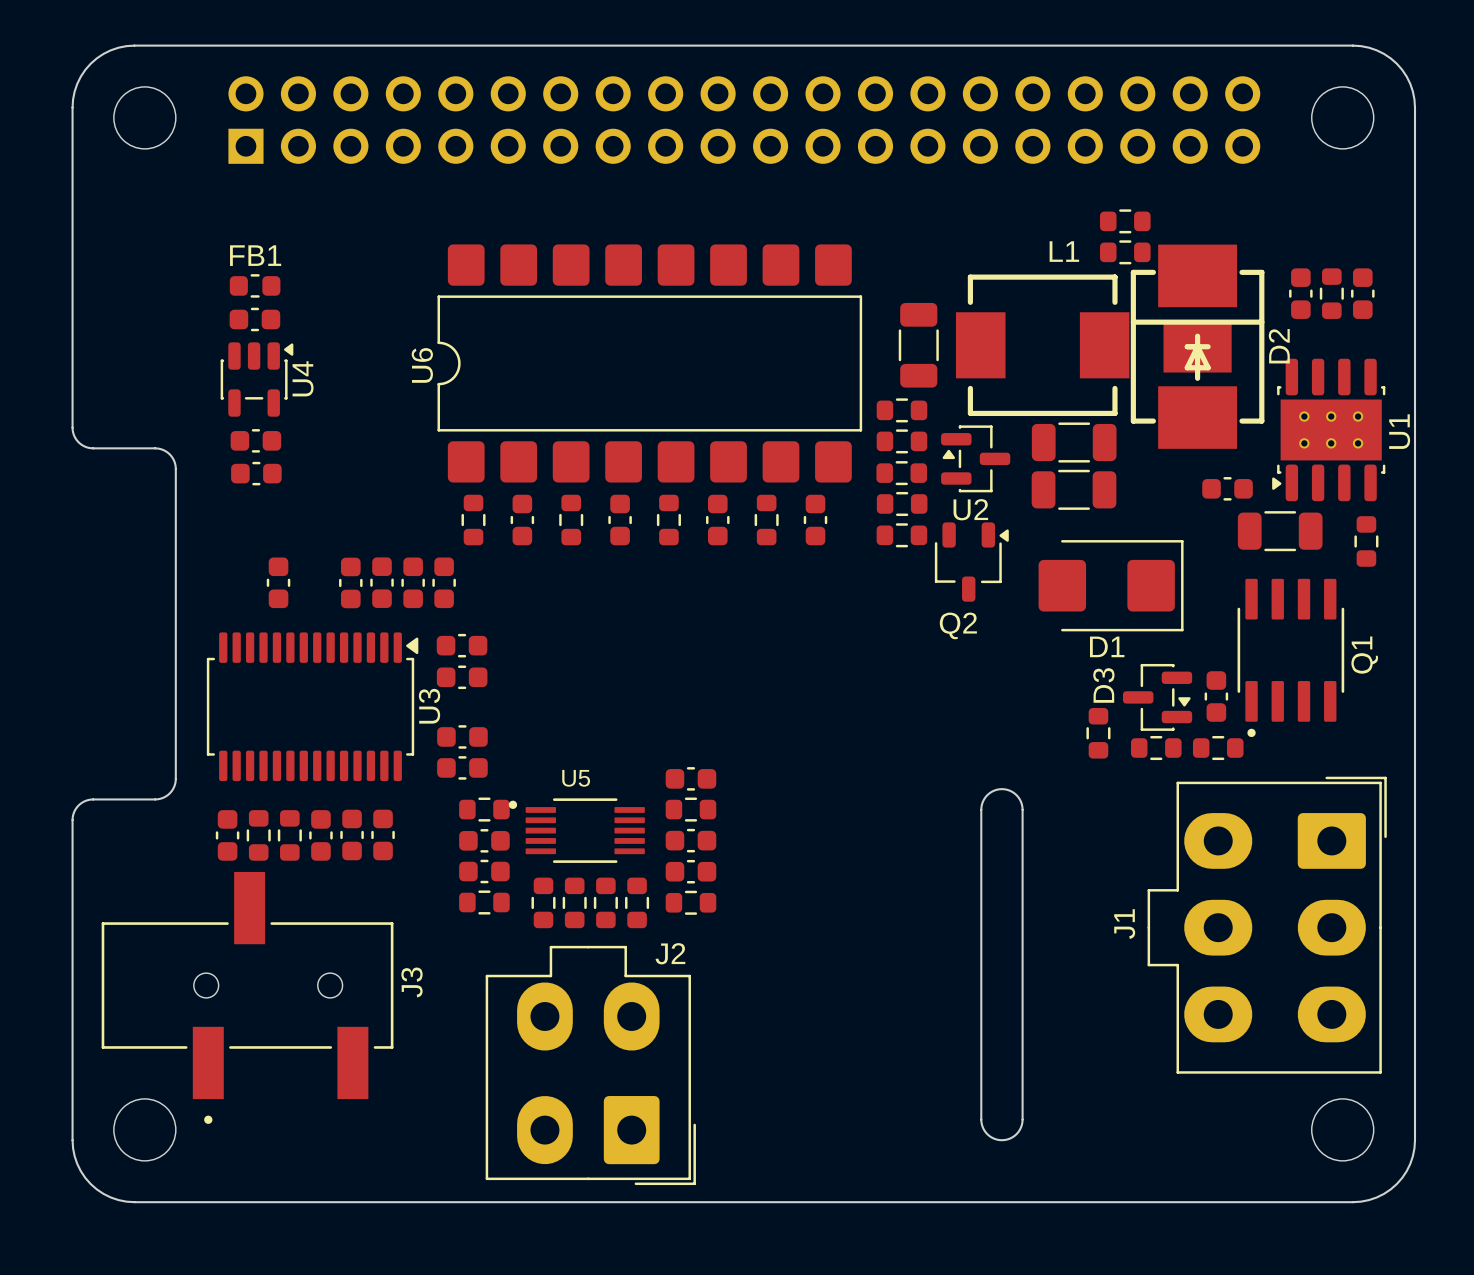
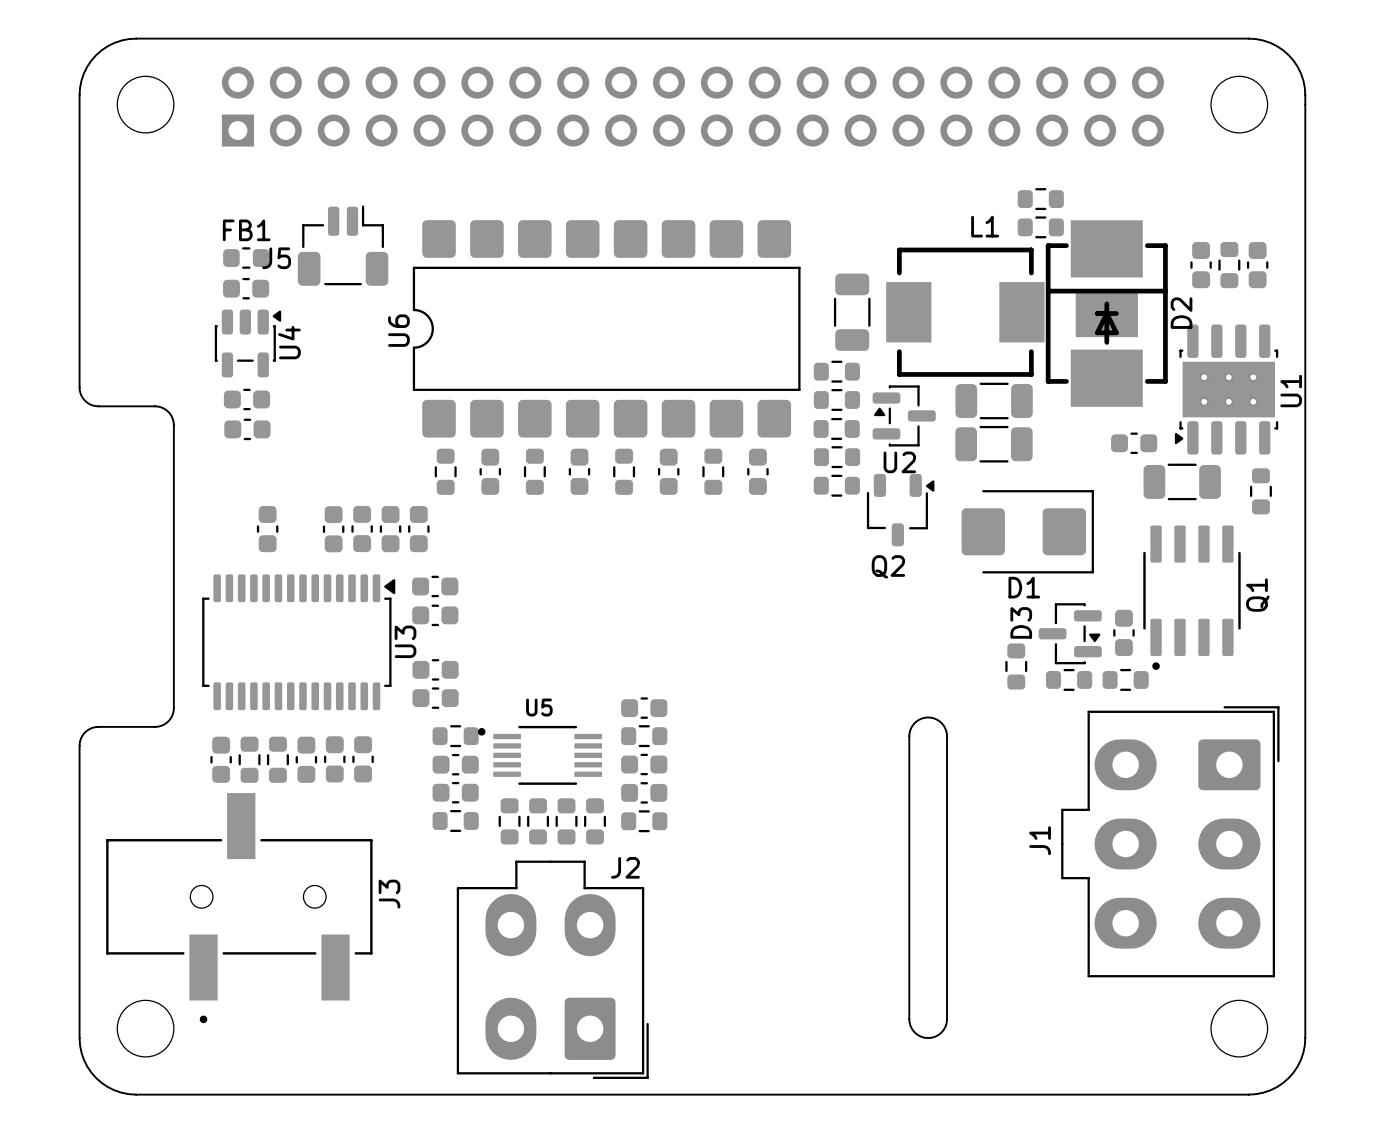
J5: none -> (343, 245)

